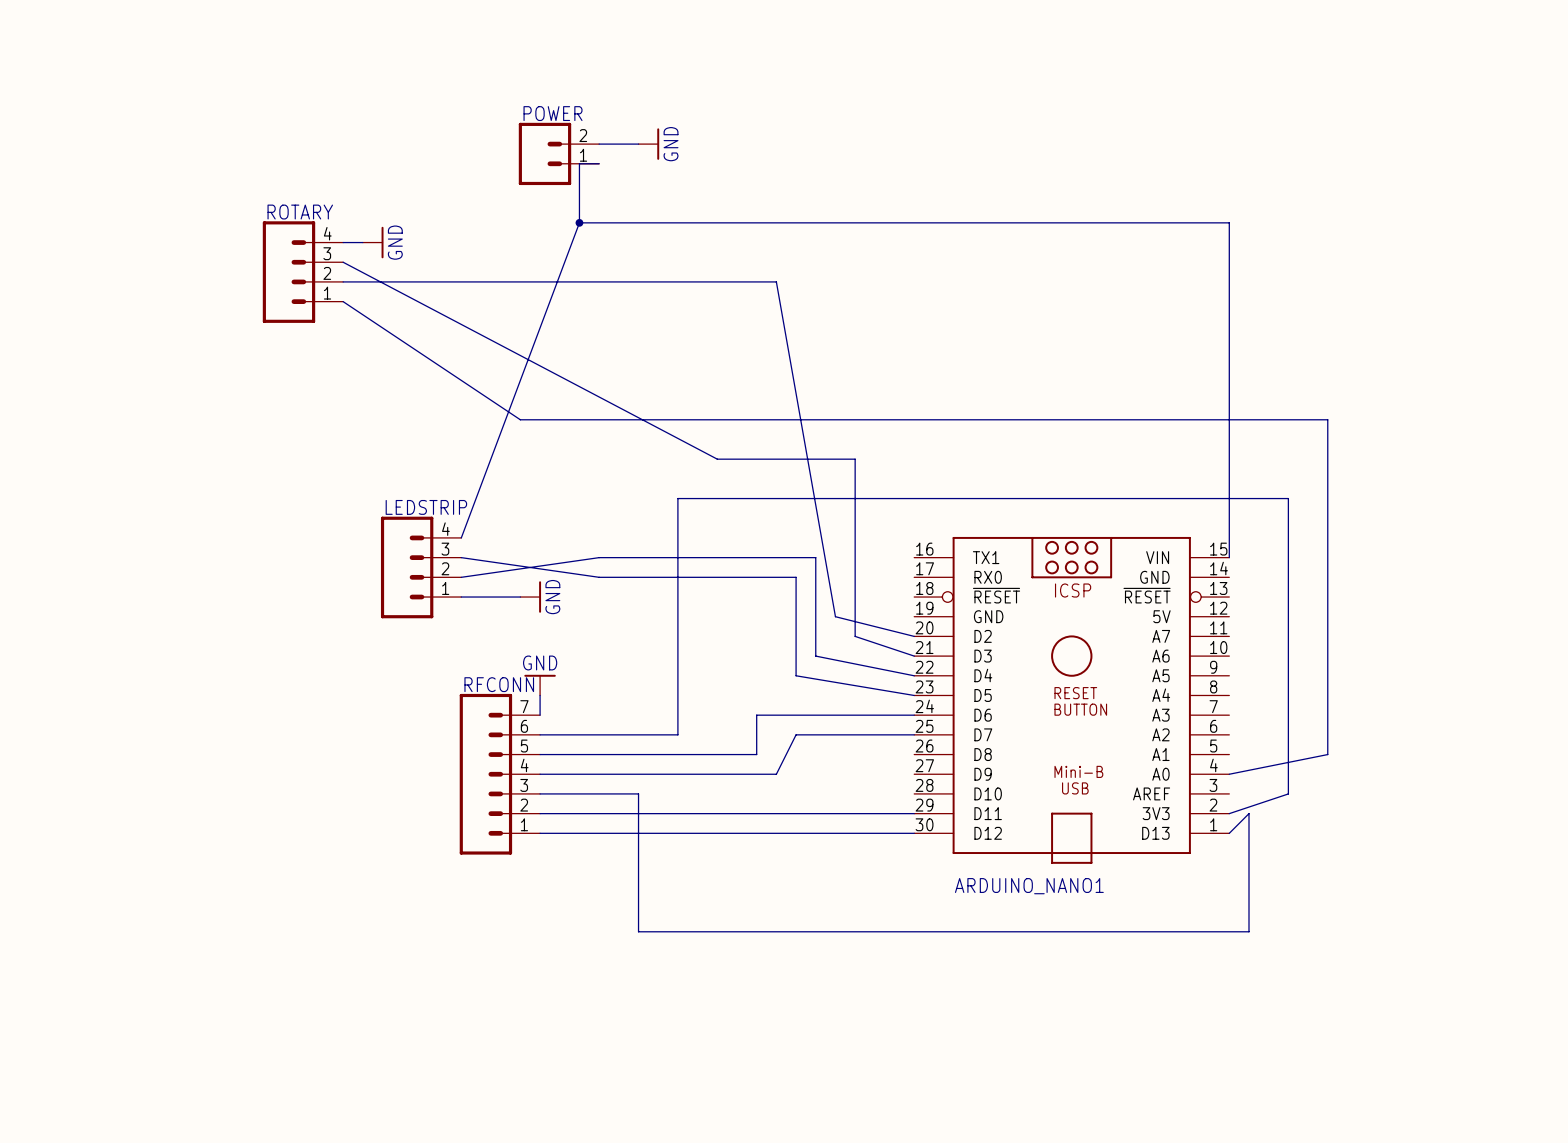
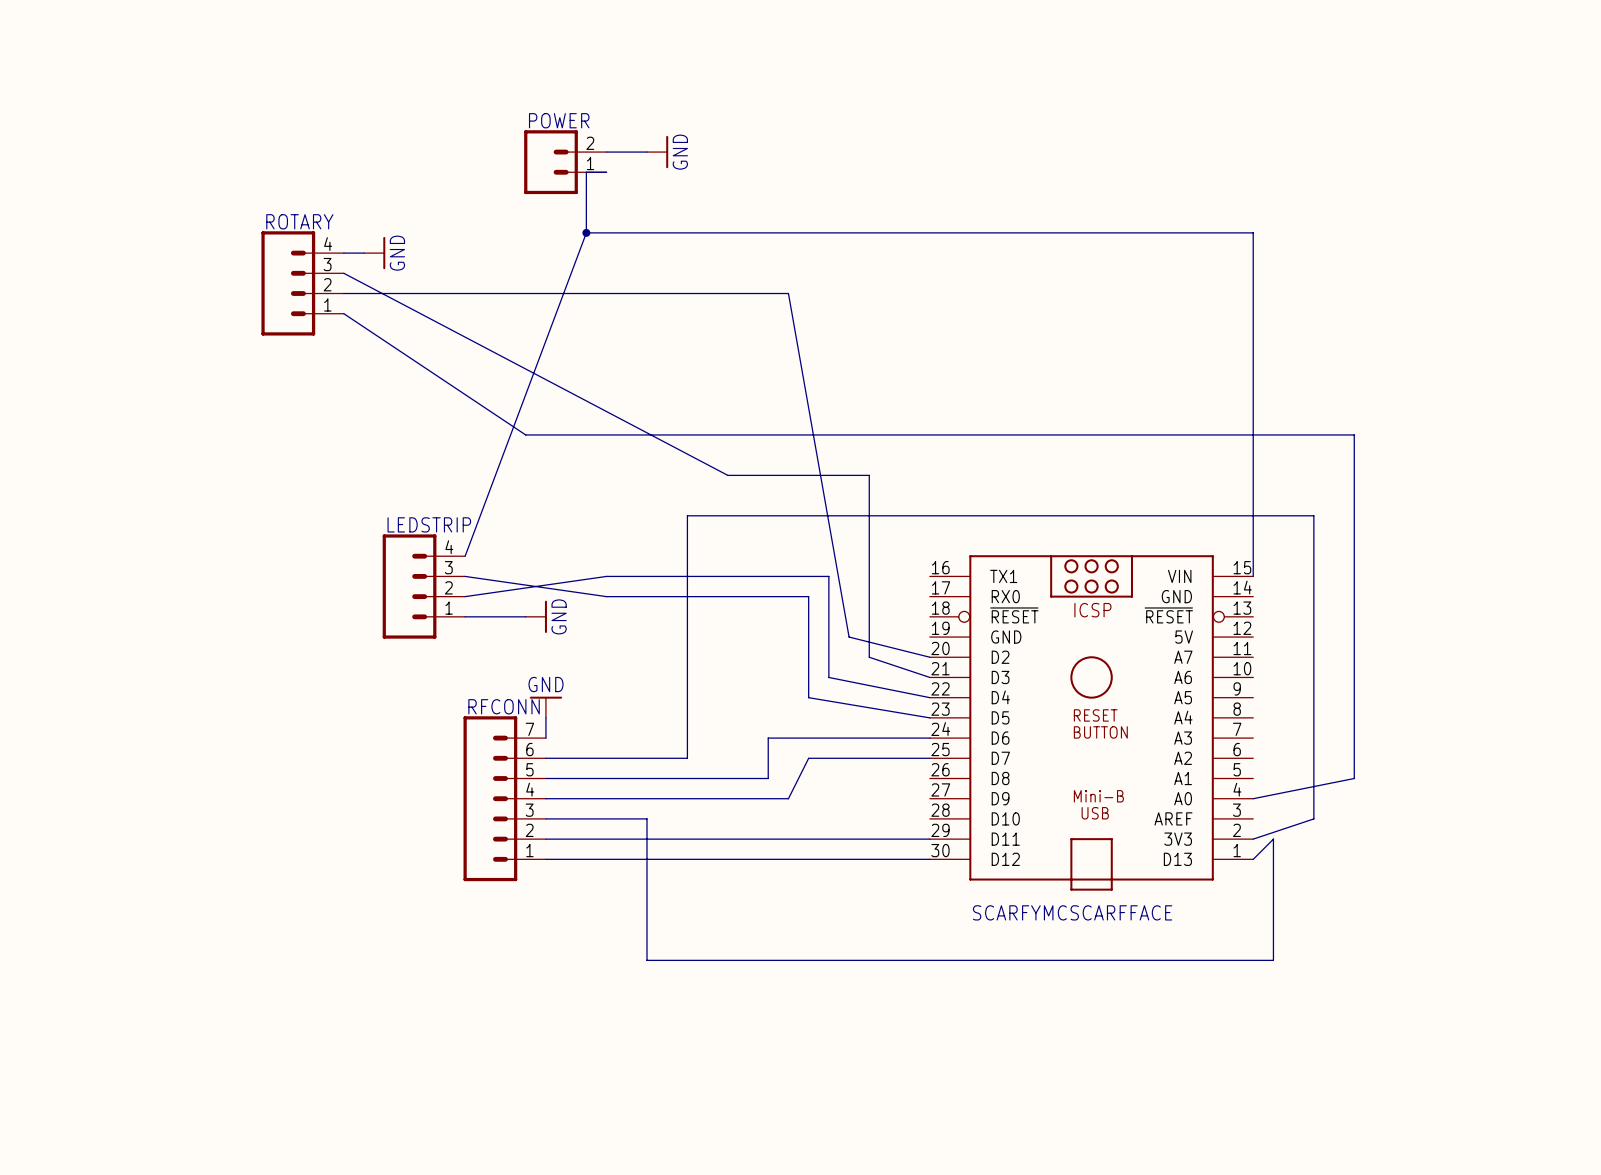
ARDUINO_NANO1 name: ARDUINO_NANO1 (1029, 886) -> SCARFYMCSCARFFACE (1072, 912)

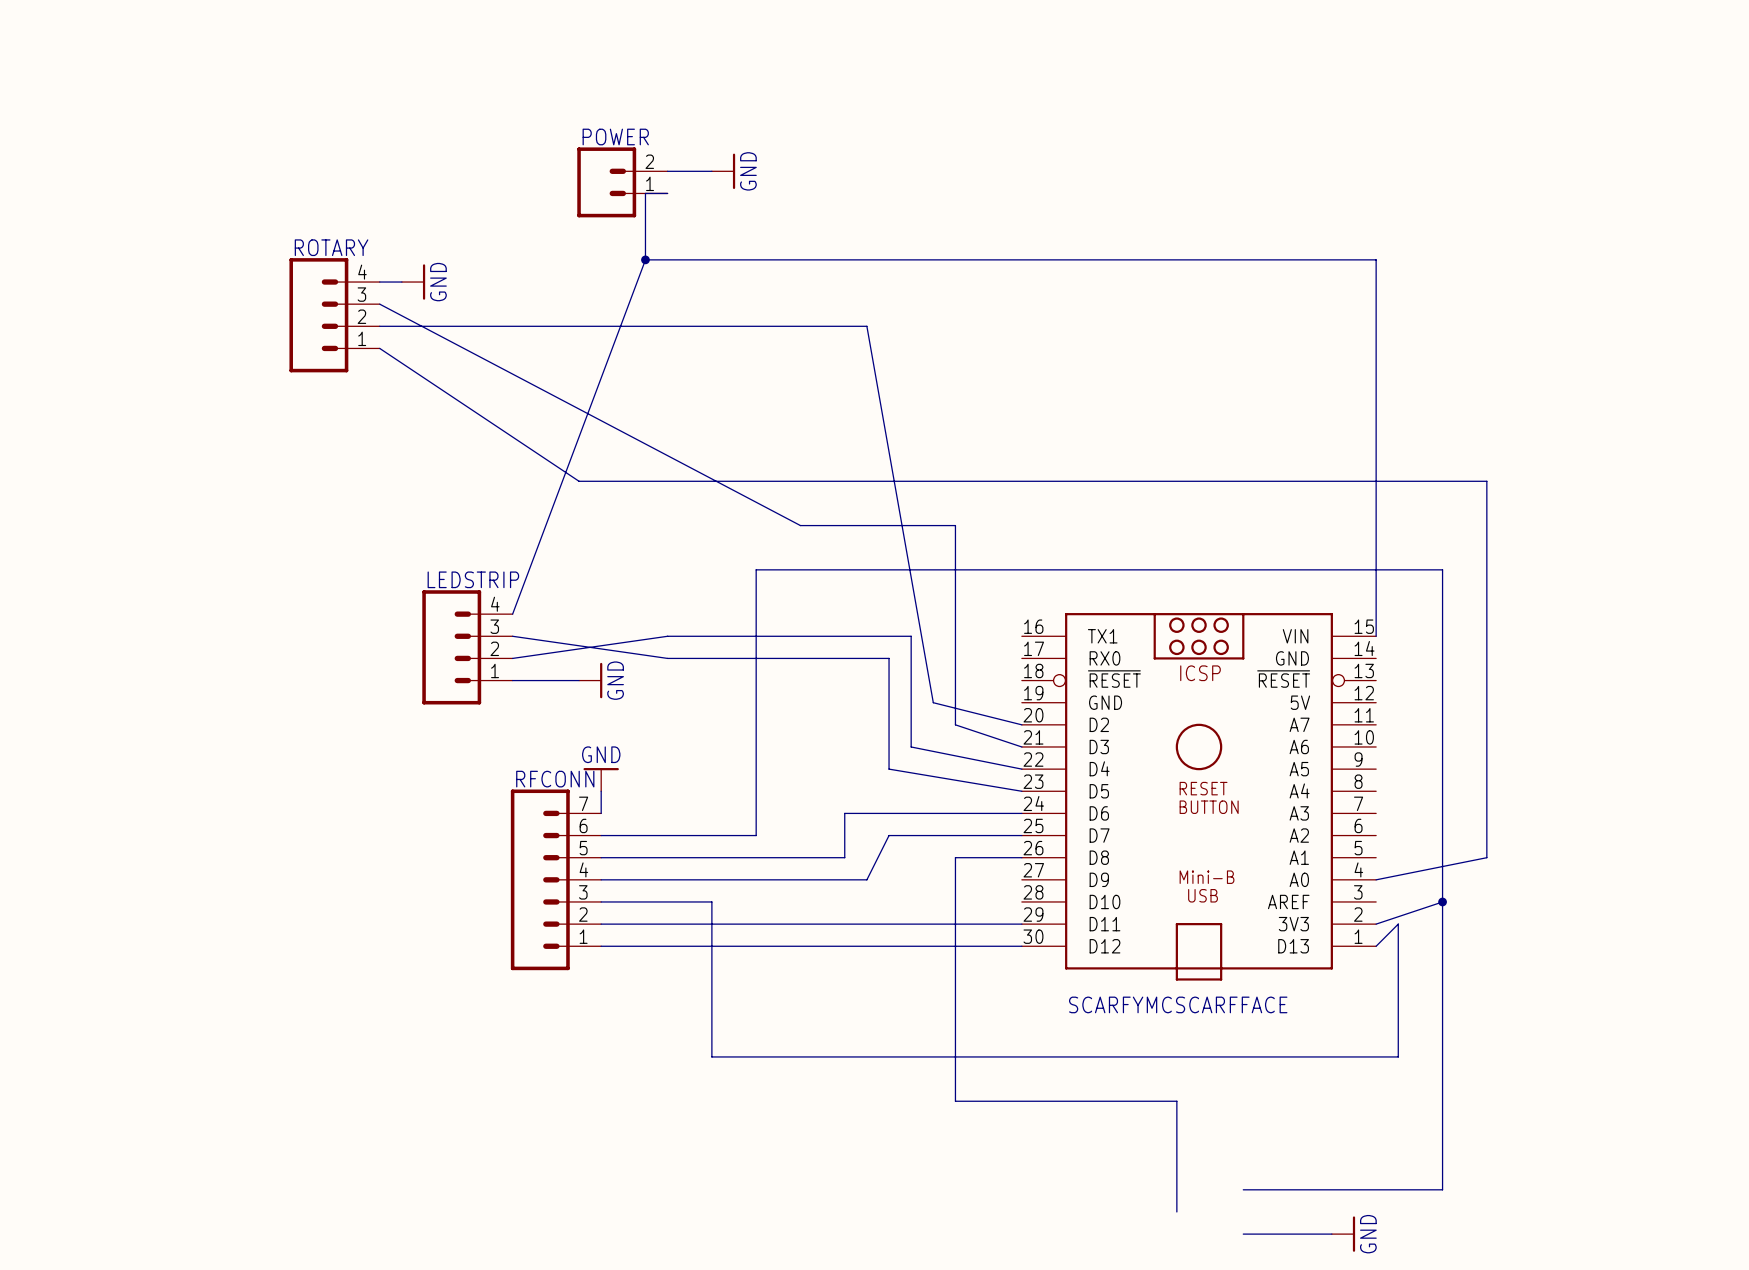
wire: none -> (1021, 857) (955, 857) (955, 1101) (1176, 1101) (1176, 1211)
wire: none -> (1442, 901) (1442, 1189) (1243, 1189)
junction: none -> (1442, 901)
wire: none -> (1243, 1234) (1331, 1234)
power symbol: none -> GND (1343, 1234)

